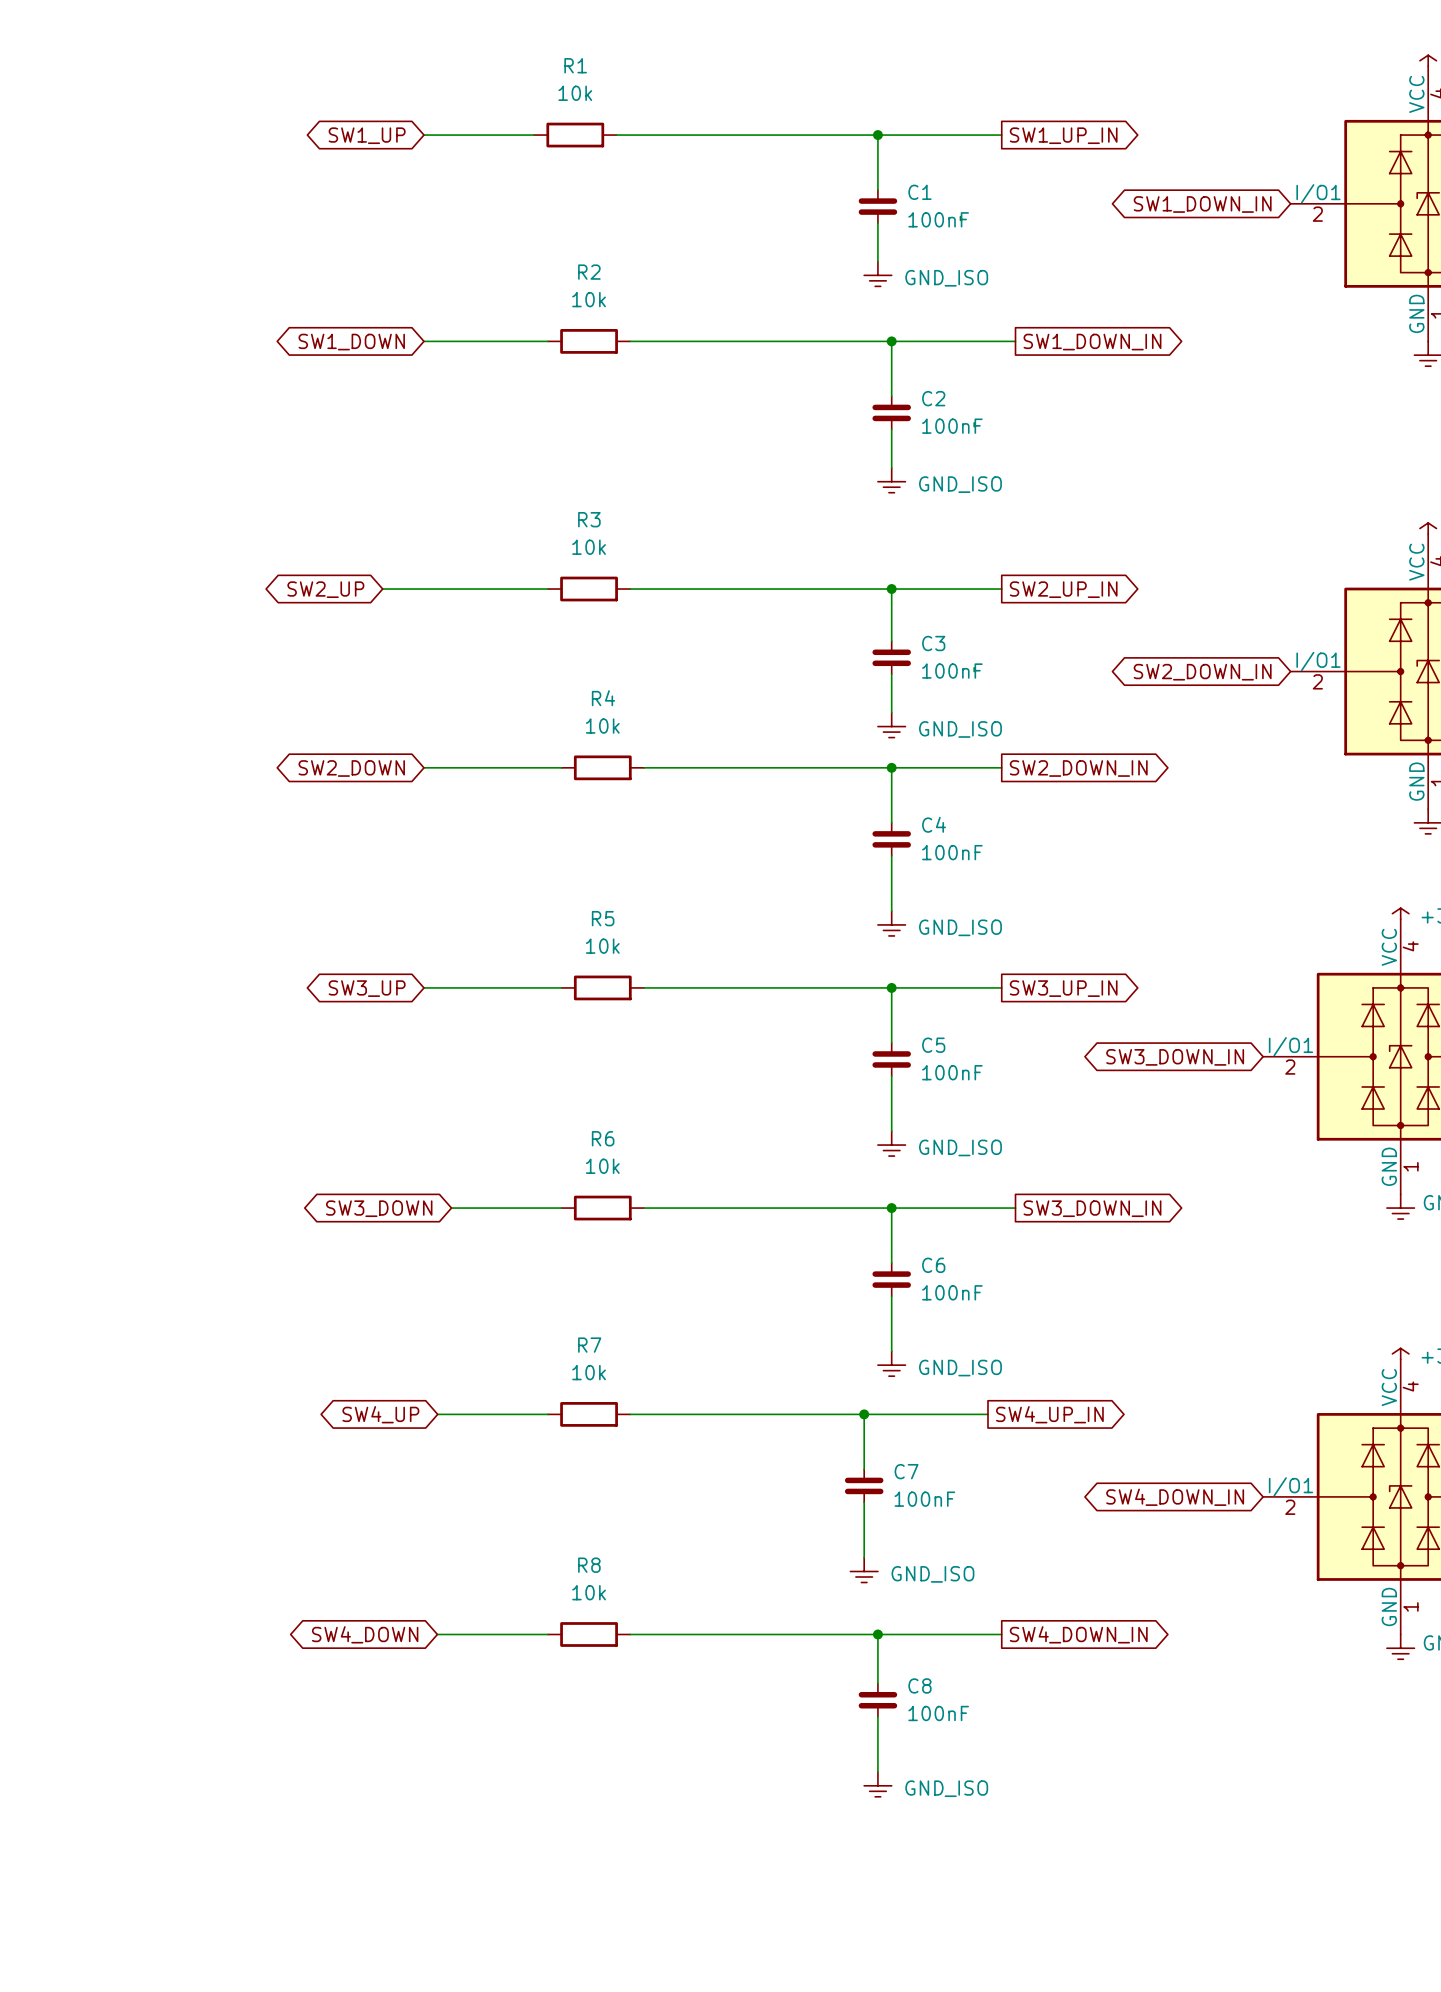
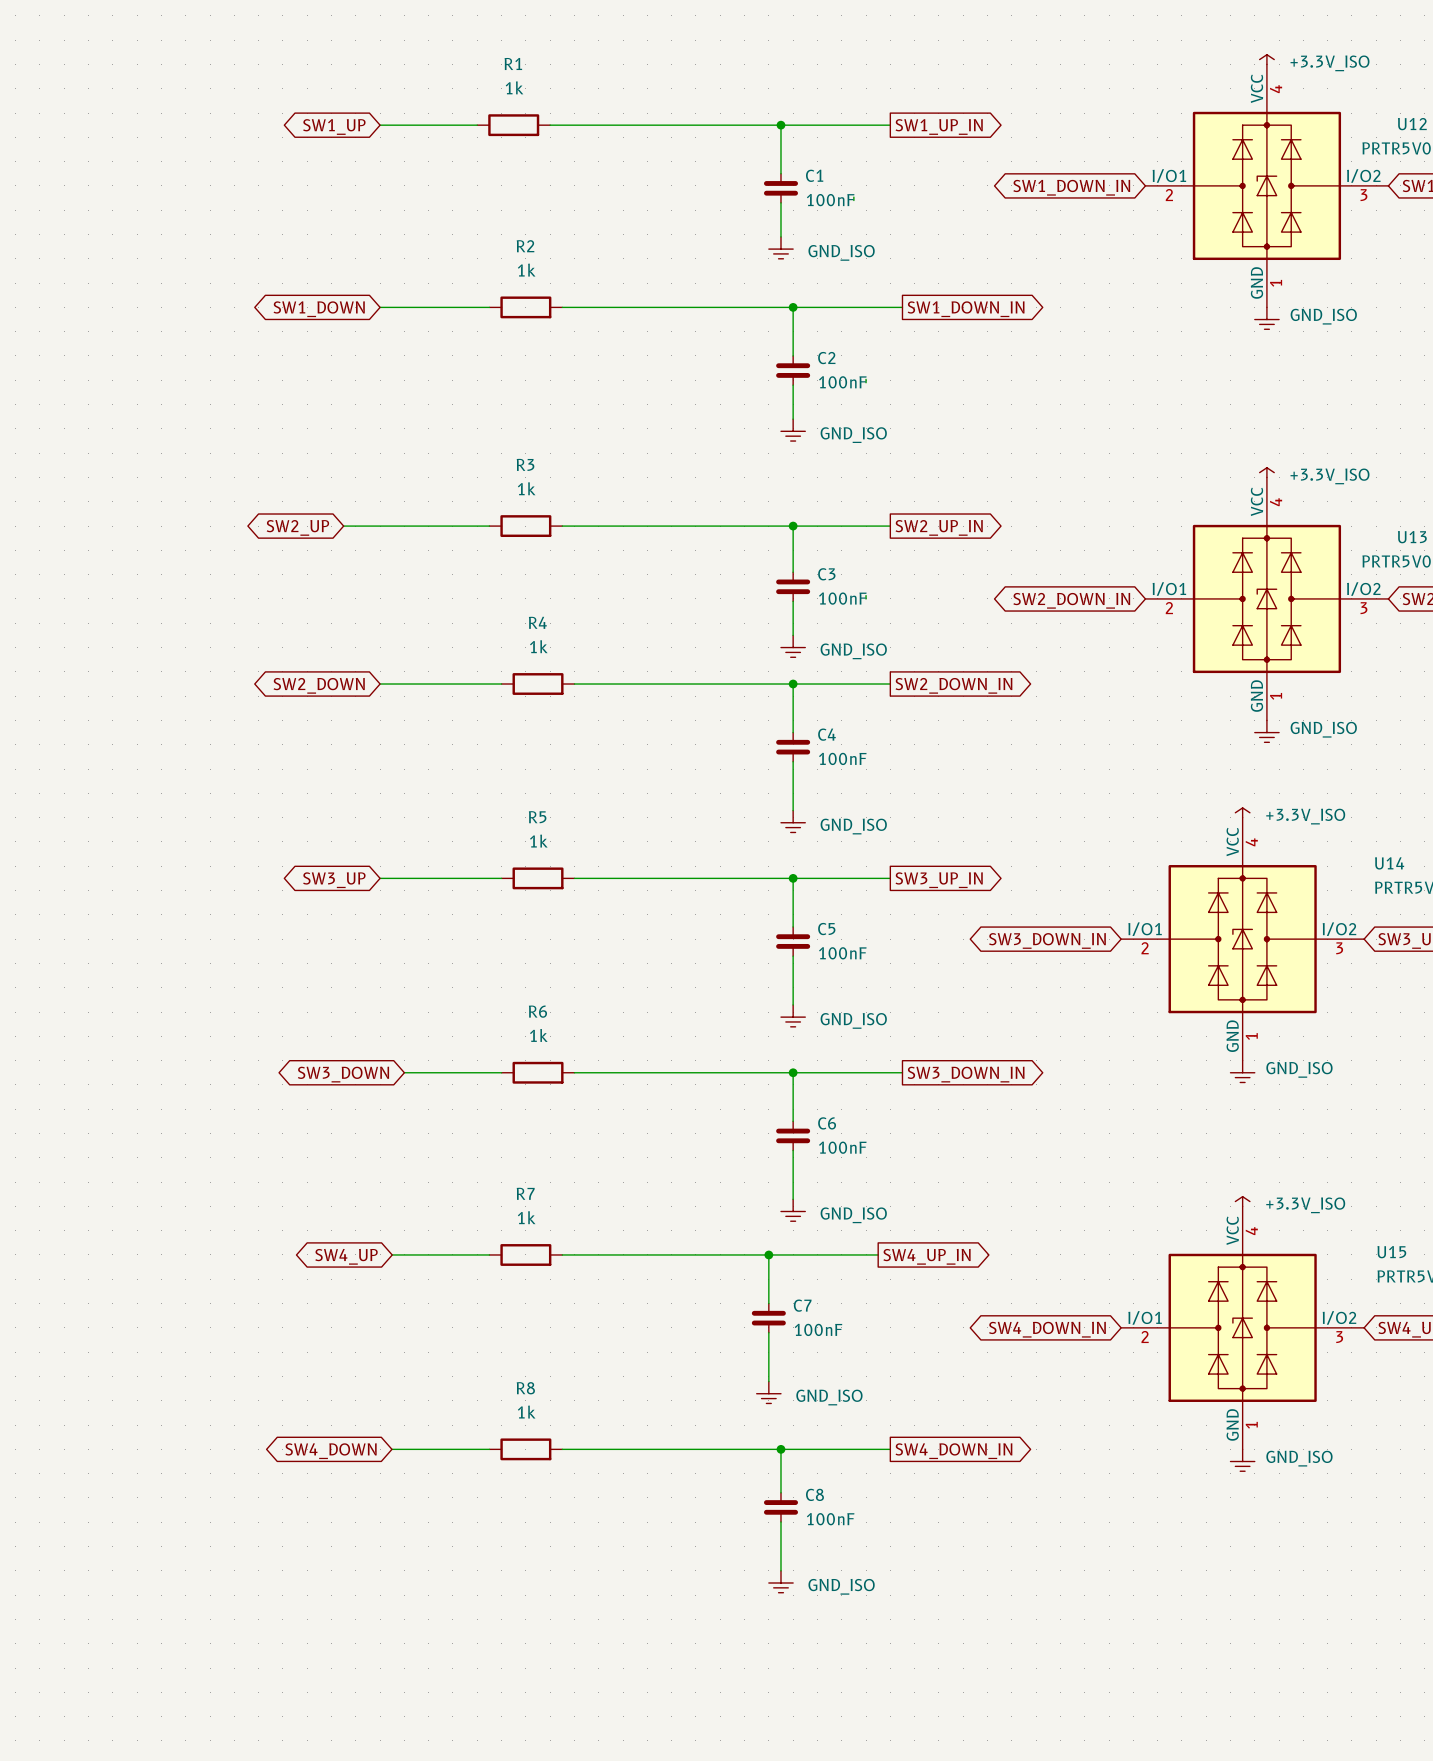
R1 value: 10k (575, 93) -> 1k (514, 87)
R2 value: 10k (589, 299) -> 1k (526, 270)
R3 value: 10k (589, 547) -> 1k (526, 488)
R4 value: 10k (602, 726) -> 1k (538, 646)
R5 value: 10k (602, 946) -> 1k (538, 841)
R6 value: 10k (602, 1166) -> 1k (538, 1035)
R7 value: 10k (589, 1372) -> 1k (526, 1217)
R8 value: 10k (589, 1592) -> 1k (526, 1412)

